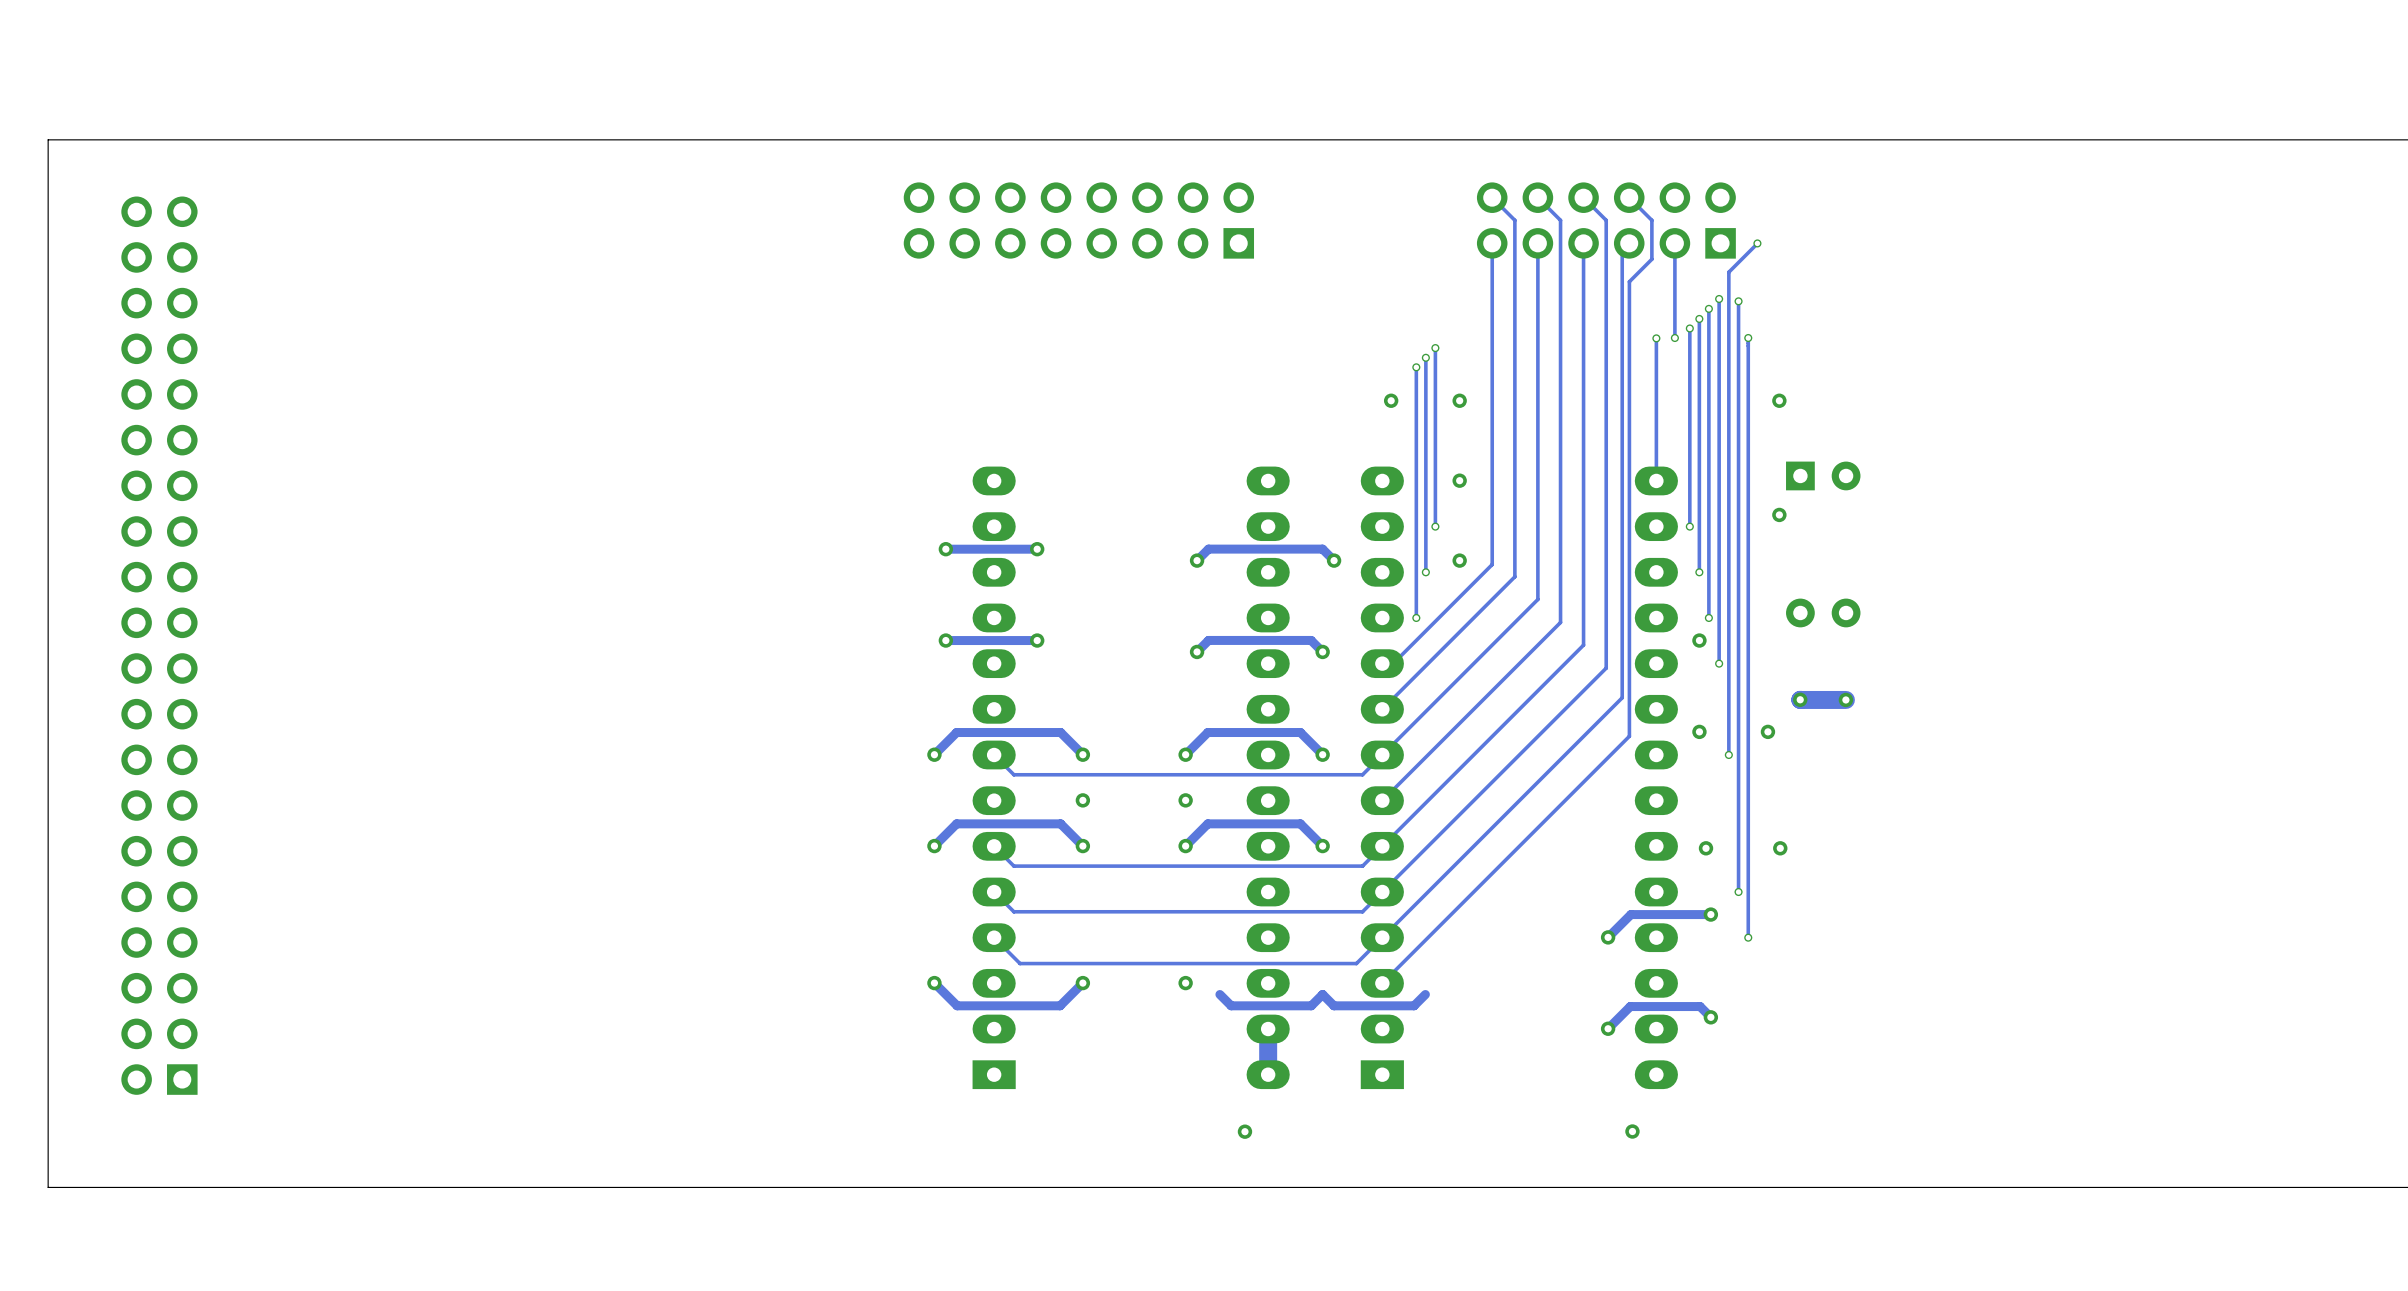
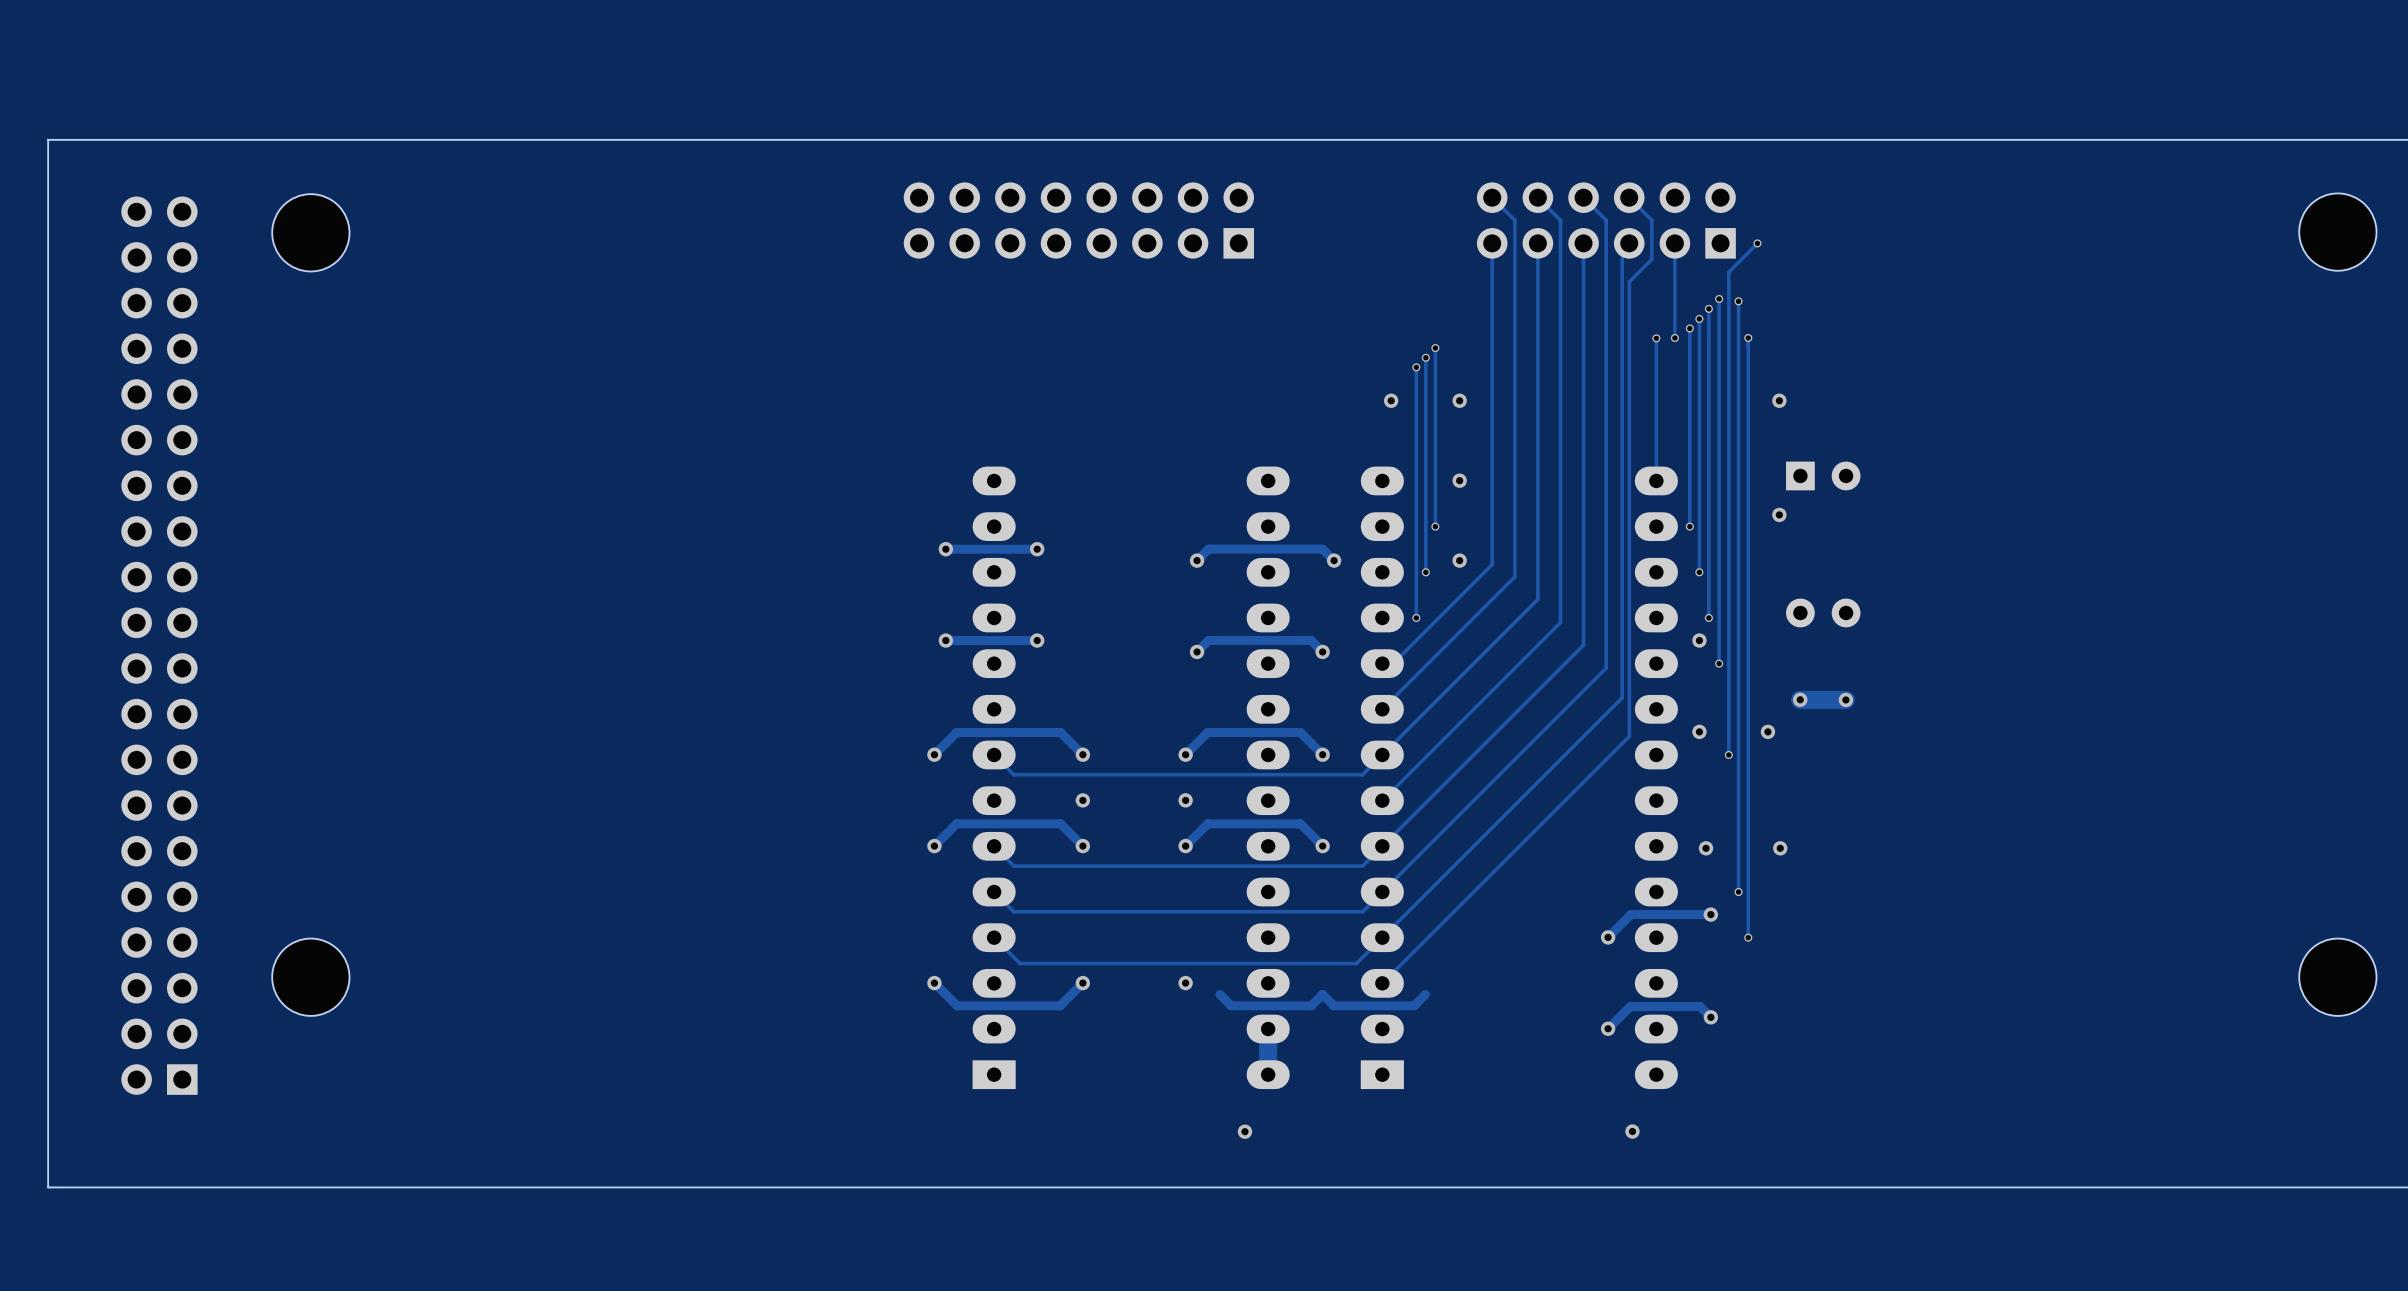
part: none -> (310, 232)
part: none -> (2337, 232)
part: none -> (310, 977)
part: none -> (2337, 977)

